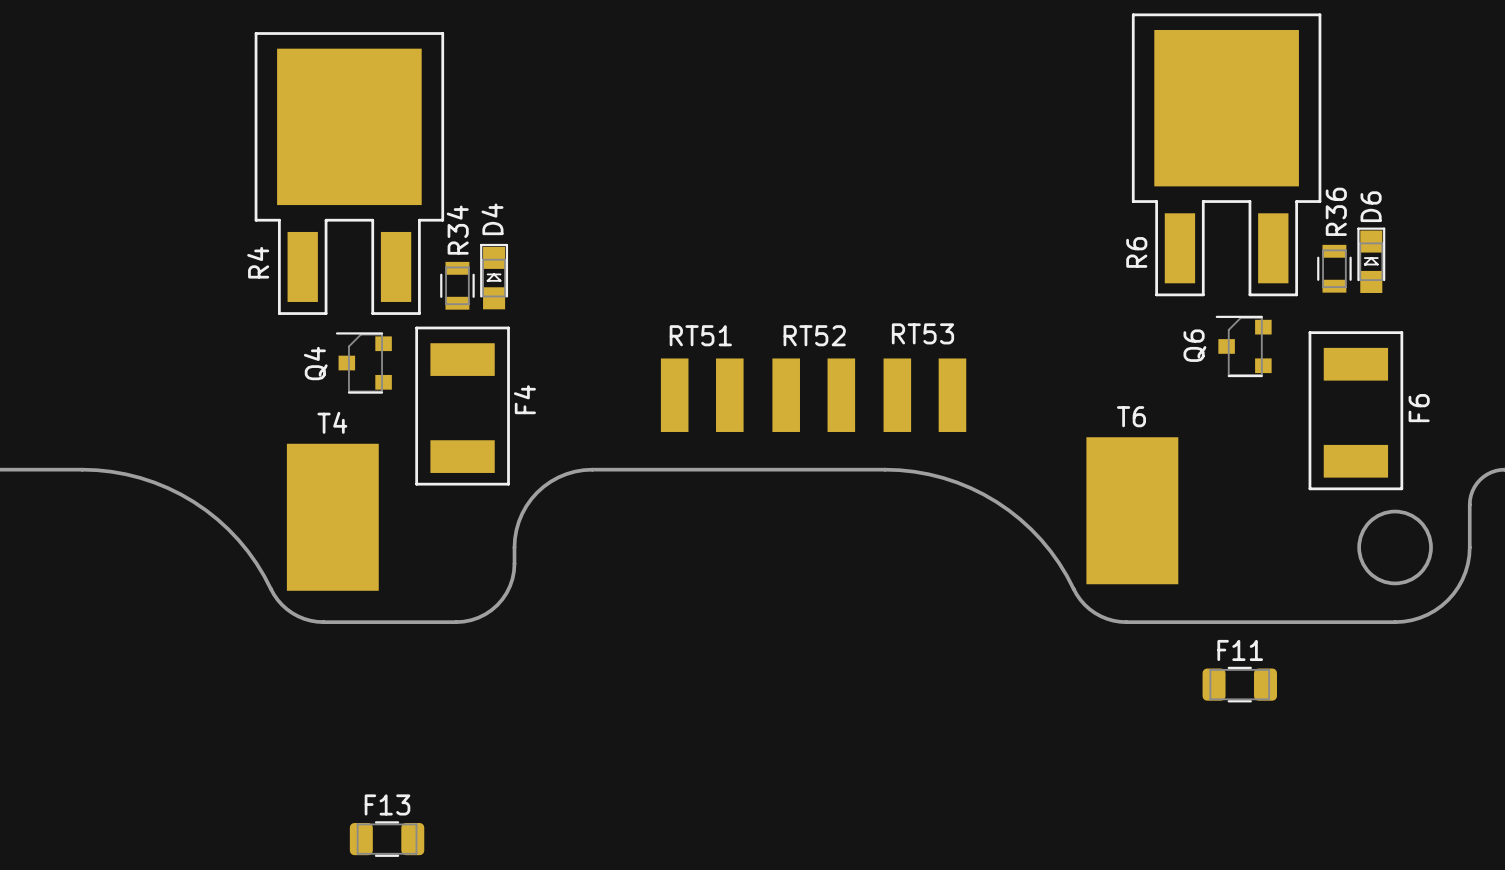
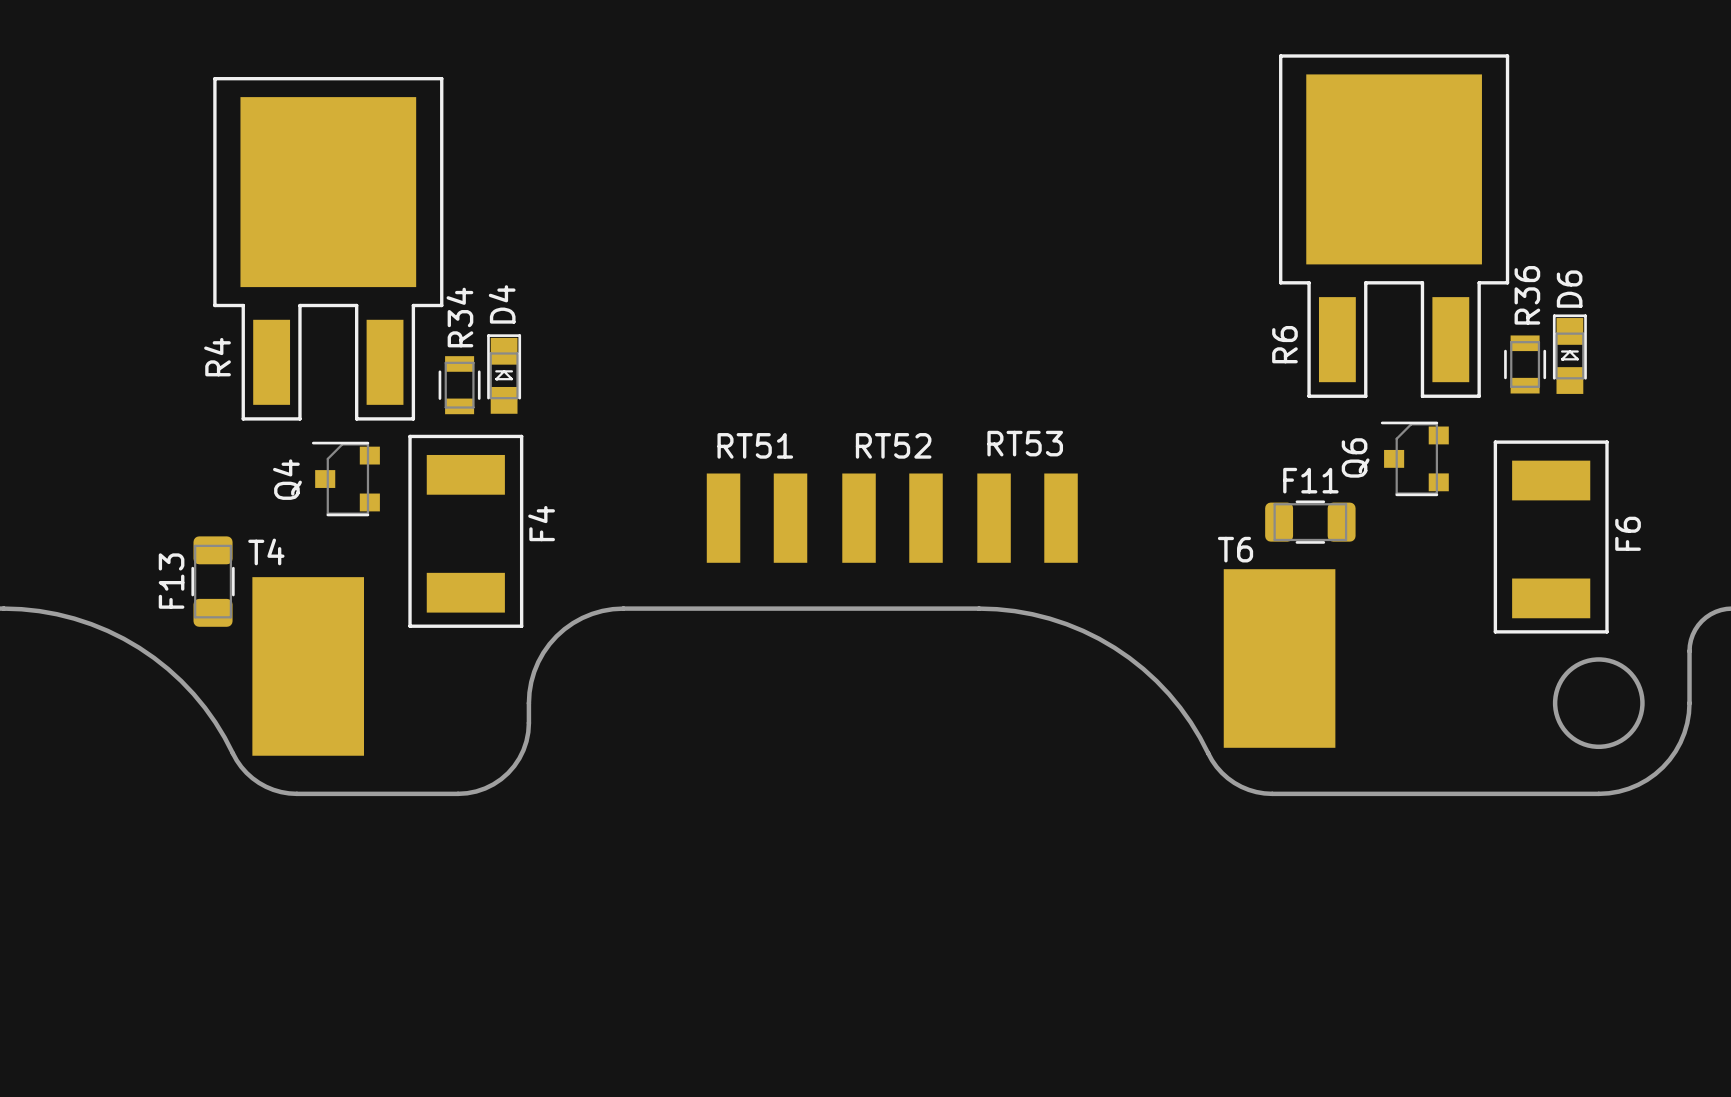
T6 name position: T6 (1131, 416) -> T6 (1235, 549)
T4 name position: T4 (332, 422) -> T4 (266, 551)
F11 position: (1239, 684) -> (1310, 522)
F13 name position: F13 (387, 804) -> F13 (171, 581)
F13 rotation: 0° (387, 839) -> 90° clockwise (213, 581)
F13 position: (387, 839) -> (213, 581)

